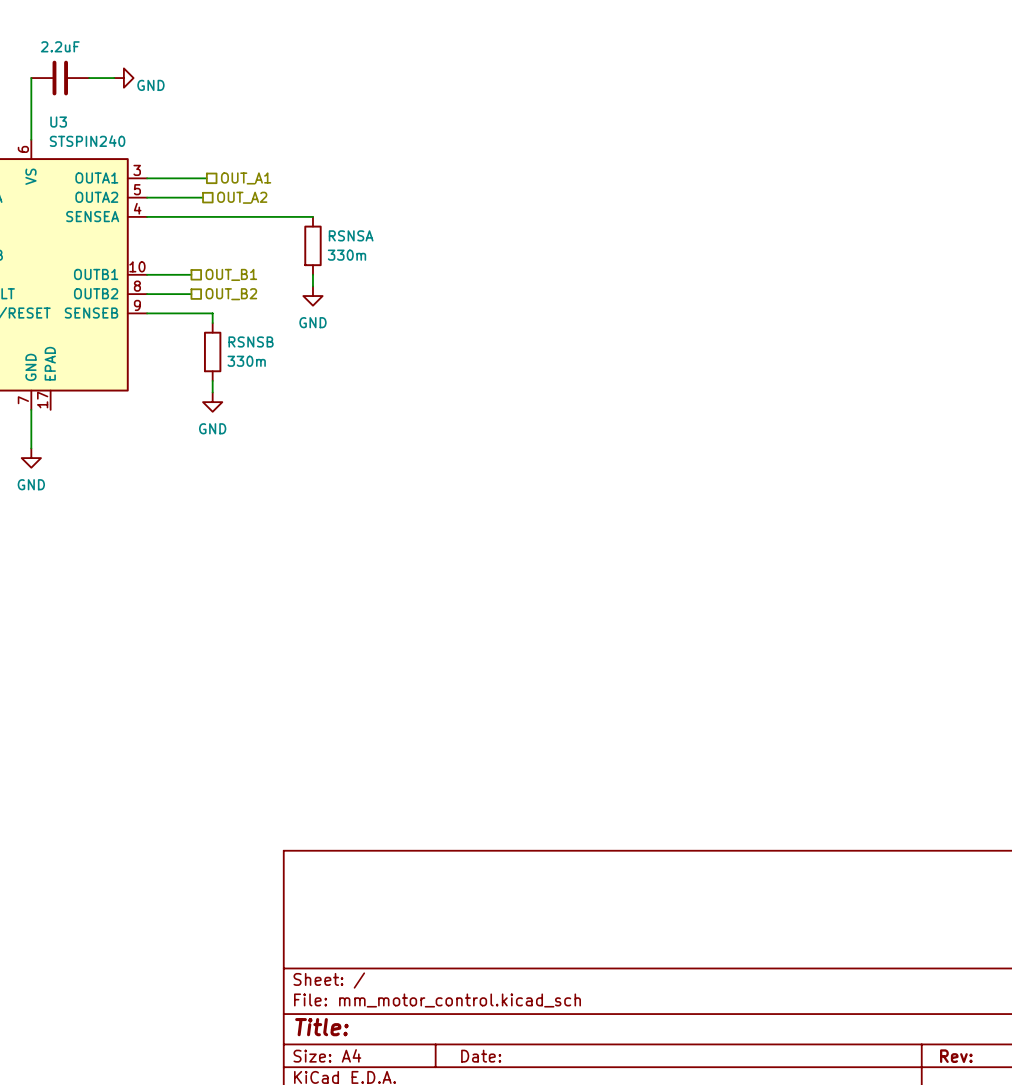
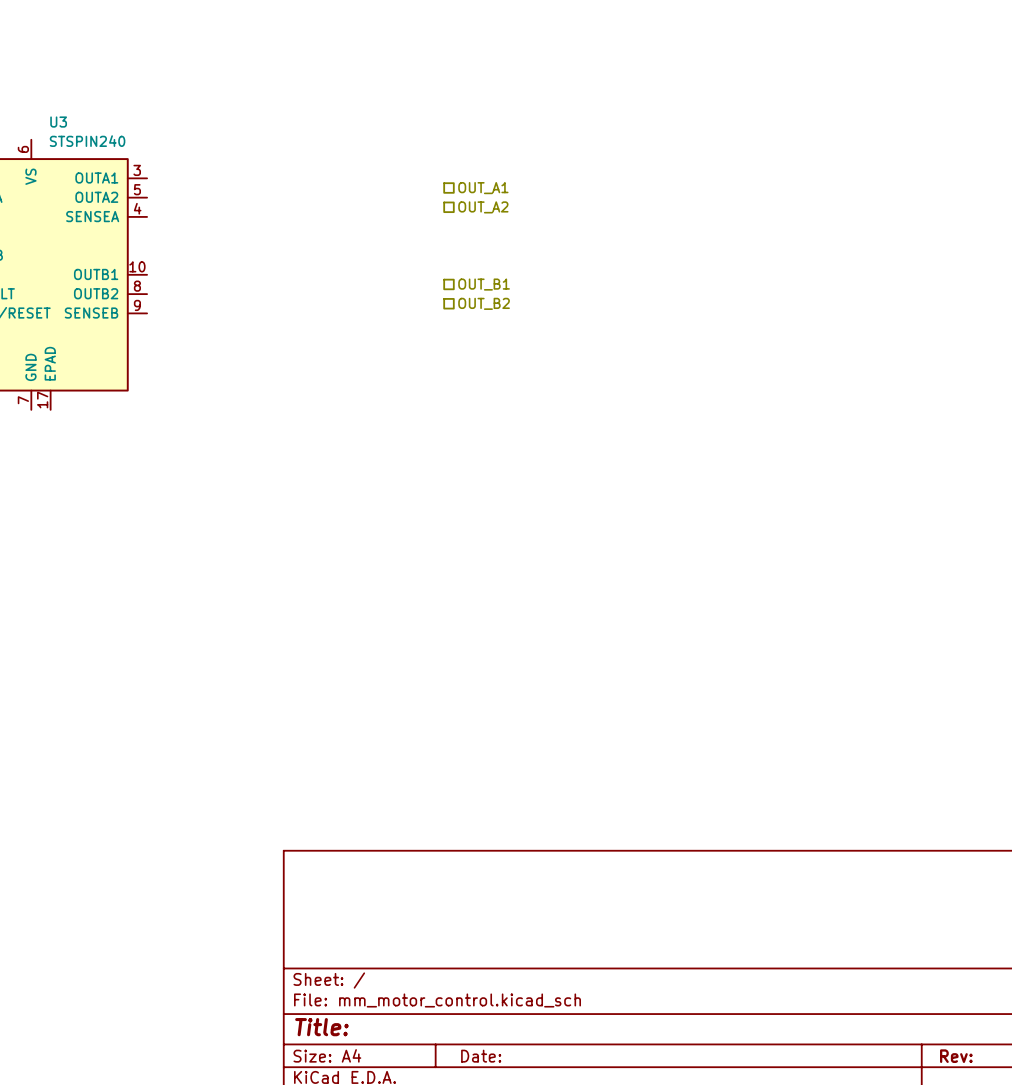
wire: (31, 78) (31, 139) -> none
part: 2.2uF (60, 78) -> none
wire: (89, 78) (114, 78) -> none
power symbol: GND (123, 78) -> none
wire: (147, 178) (206, 178) -> none
hierarchical label: OUT_A1 (246, 178) -> none
hierarchical label: none -> OUT_A1 (483, 188)
wire: (147, 197) (203, 197) -> none
hierarchical label: OUT_A2 (242, 197) -> none
hierarchical label: none -> OUT_A2 (483, 207)
wire: (147, 216) (312, 216) -> none
RSNSA: 330m (312, 245) -> none
wire: (147, 274) (191, 274) -> none
hierarchical label: OUT_B1 (231, 274) -> none
wire: (312, 274) (312, 286) -> none
hierarchical label: none -> OUT_B1 (484, 284)
wire: (147, 294) (191, 294) -> none
hierarchical label: OUT_B2 (231, 294) -> none
power symbol: GND (312, 296) -> none
hierarchical label: none -> OUT_B2 (484, 303)
wire: (147, 313) (212, 313) (212, 323) -> none
RSNSB: 330m (212, 351) -> none
wire: (212, 380) (212, 392) -> none
power symbol: GND (212, 402) -> none
wire: (31, 409) (31, 448) -> none
power symbol: GND (31, 458) -> none

